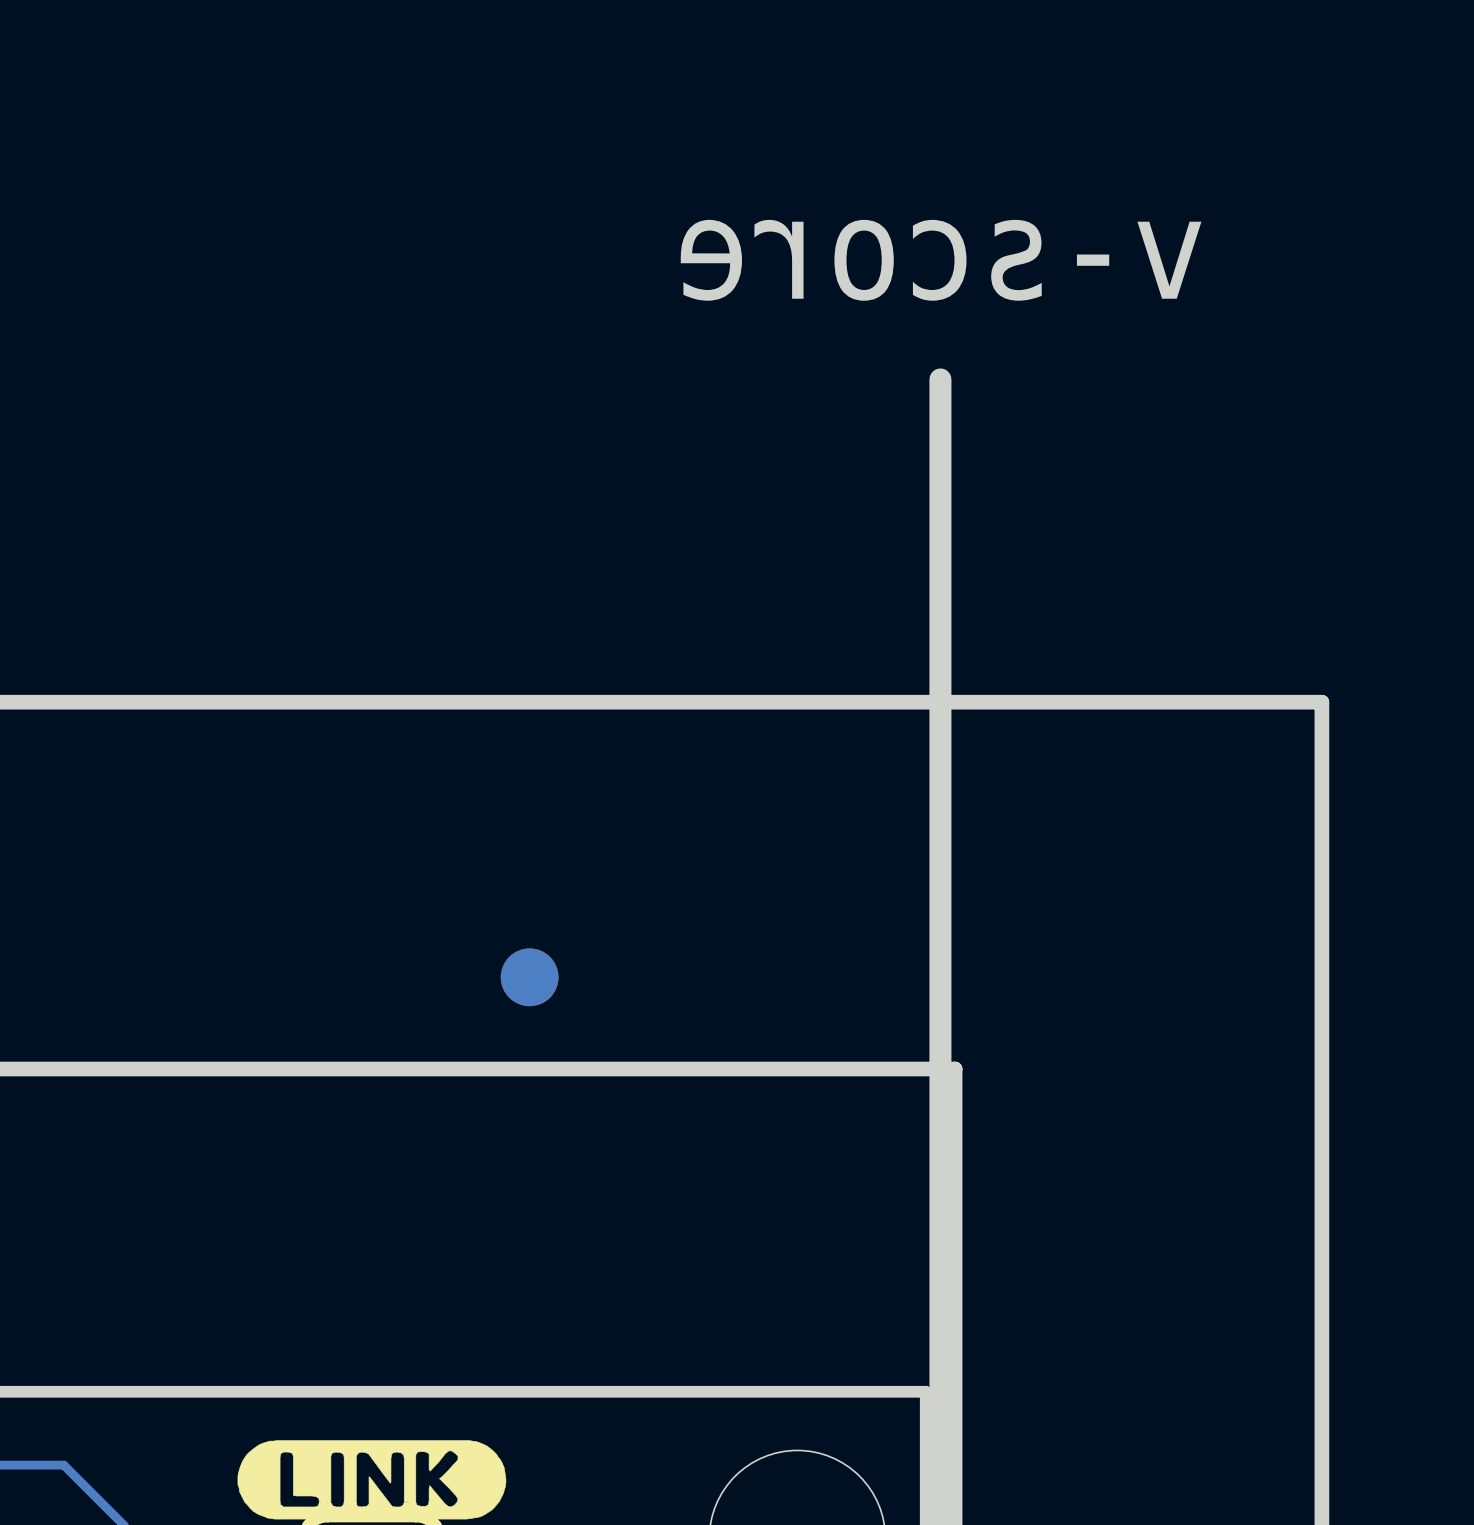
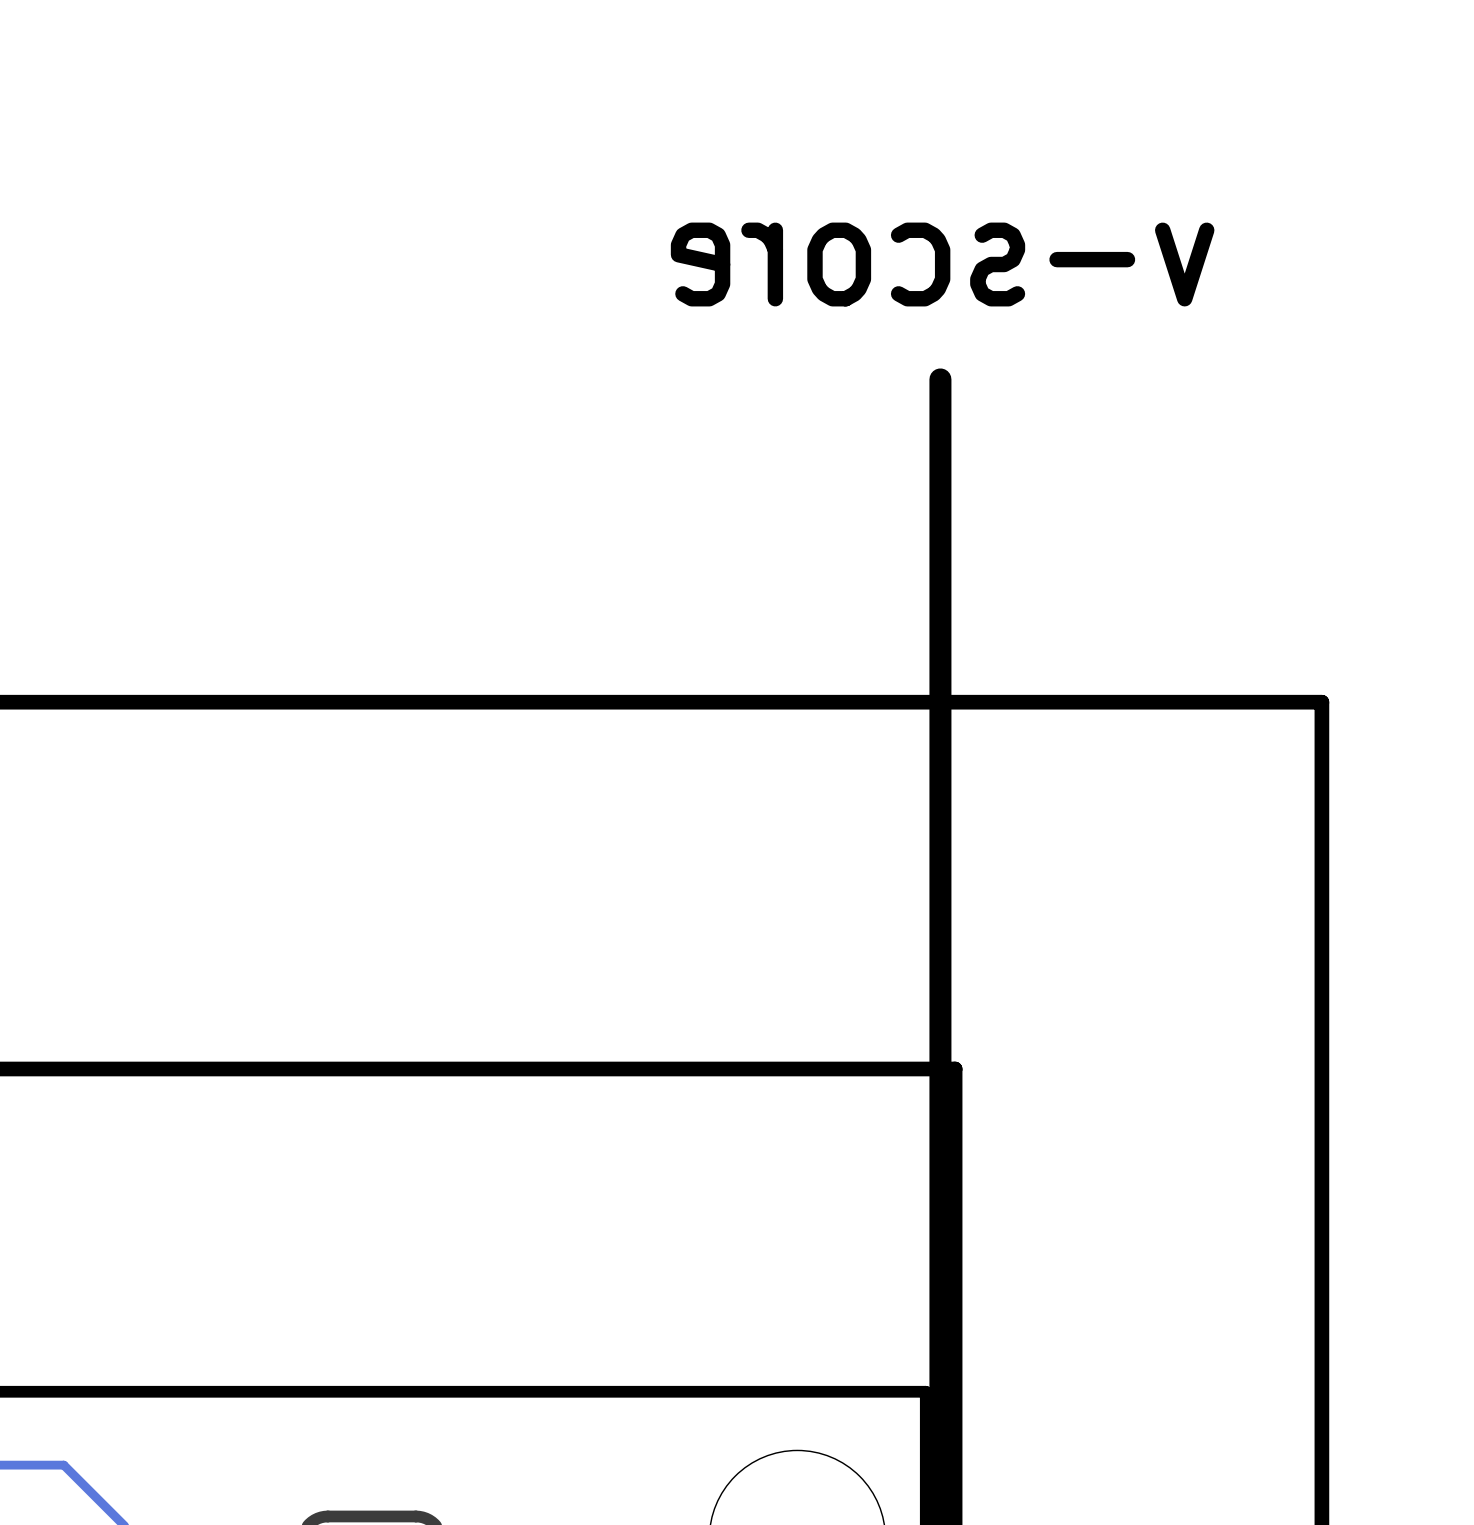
part: (529, 977) -> none
drawing: [237, 1440, 507, 1520] -> none

